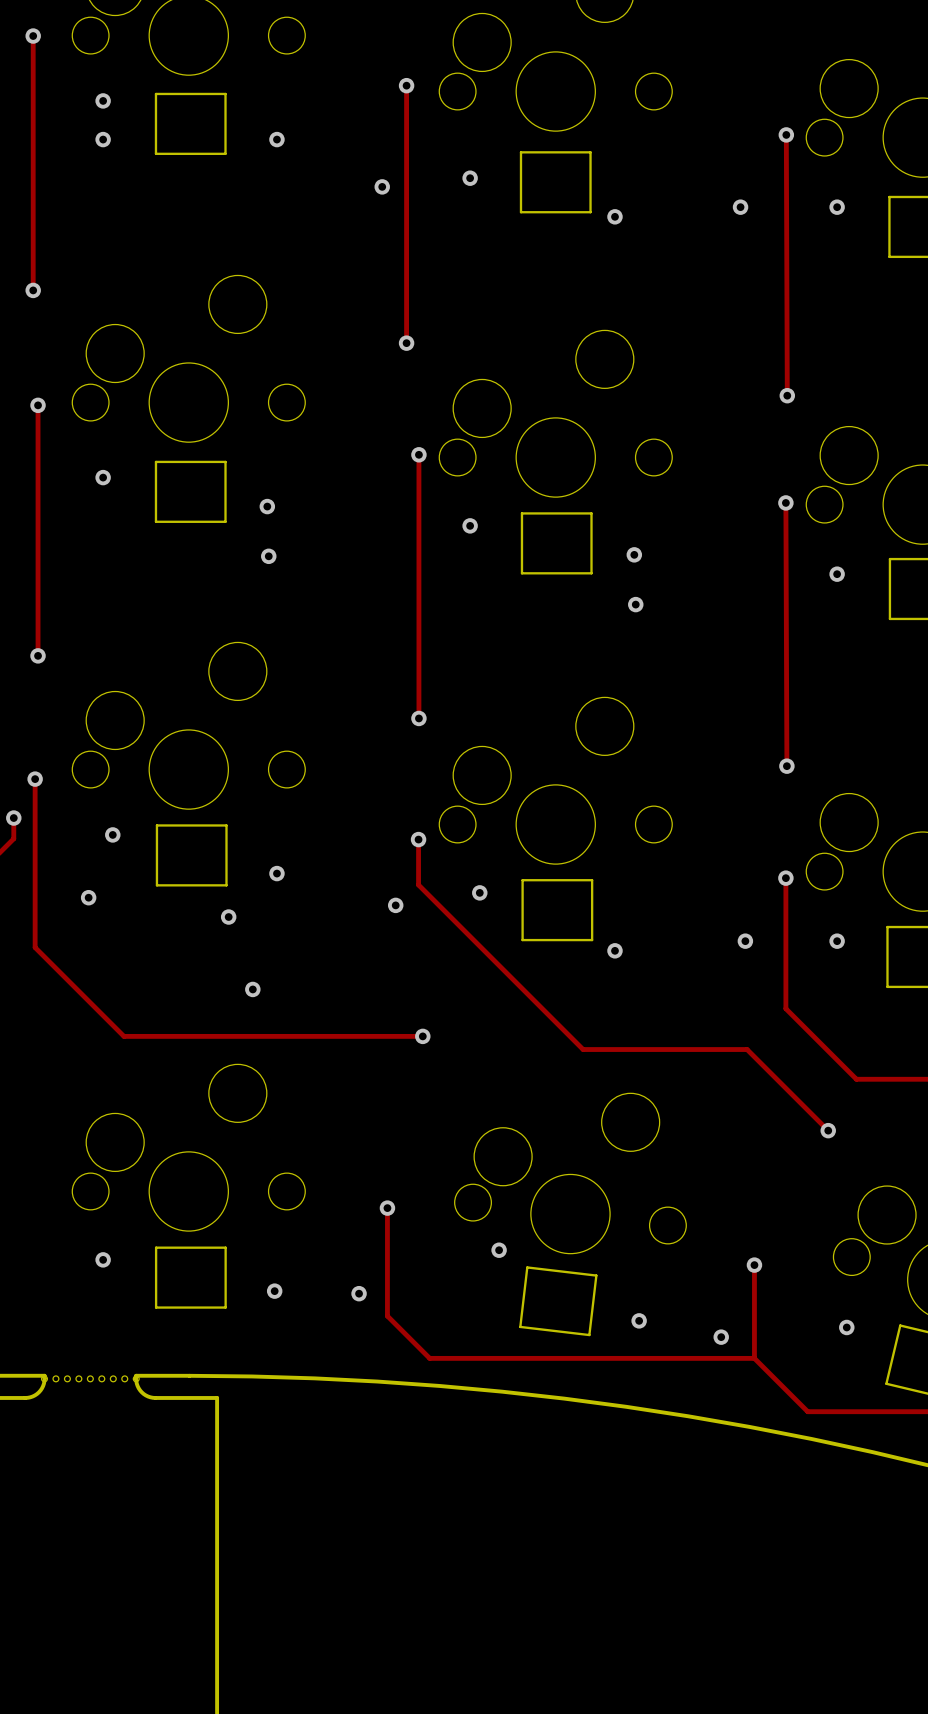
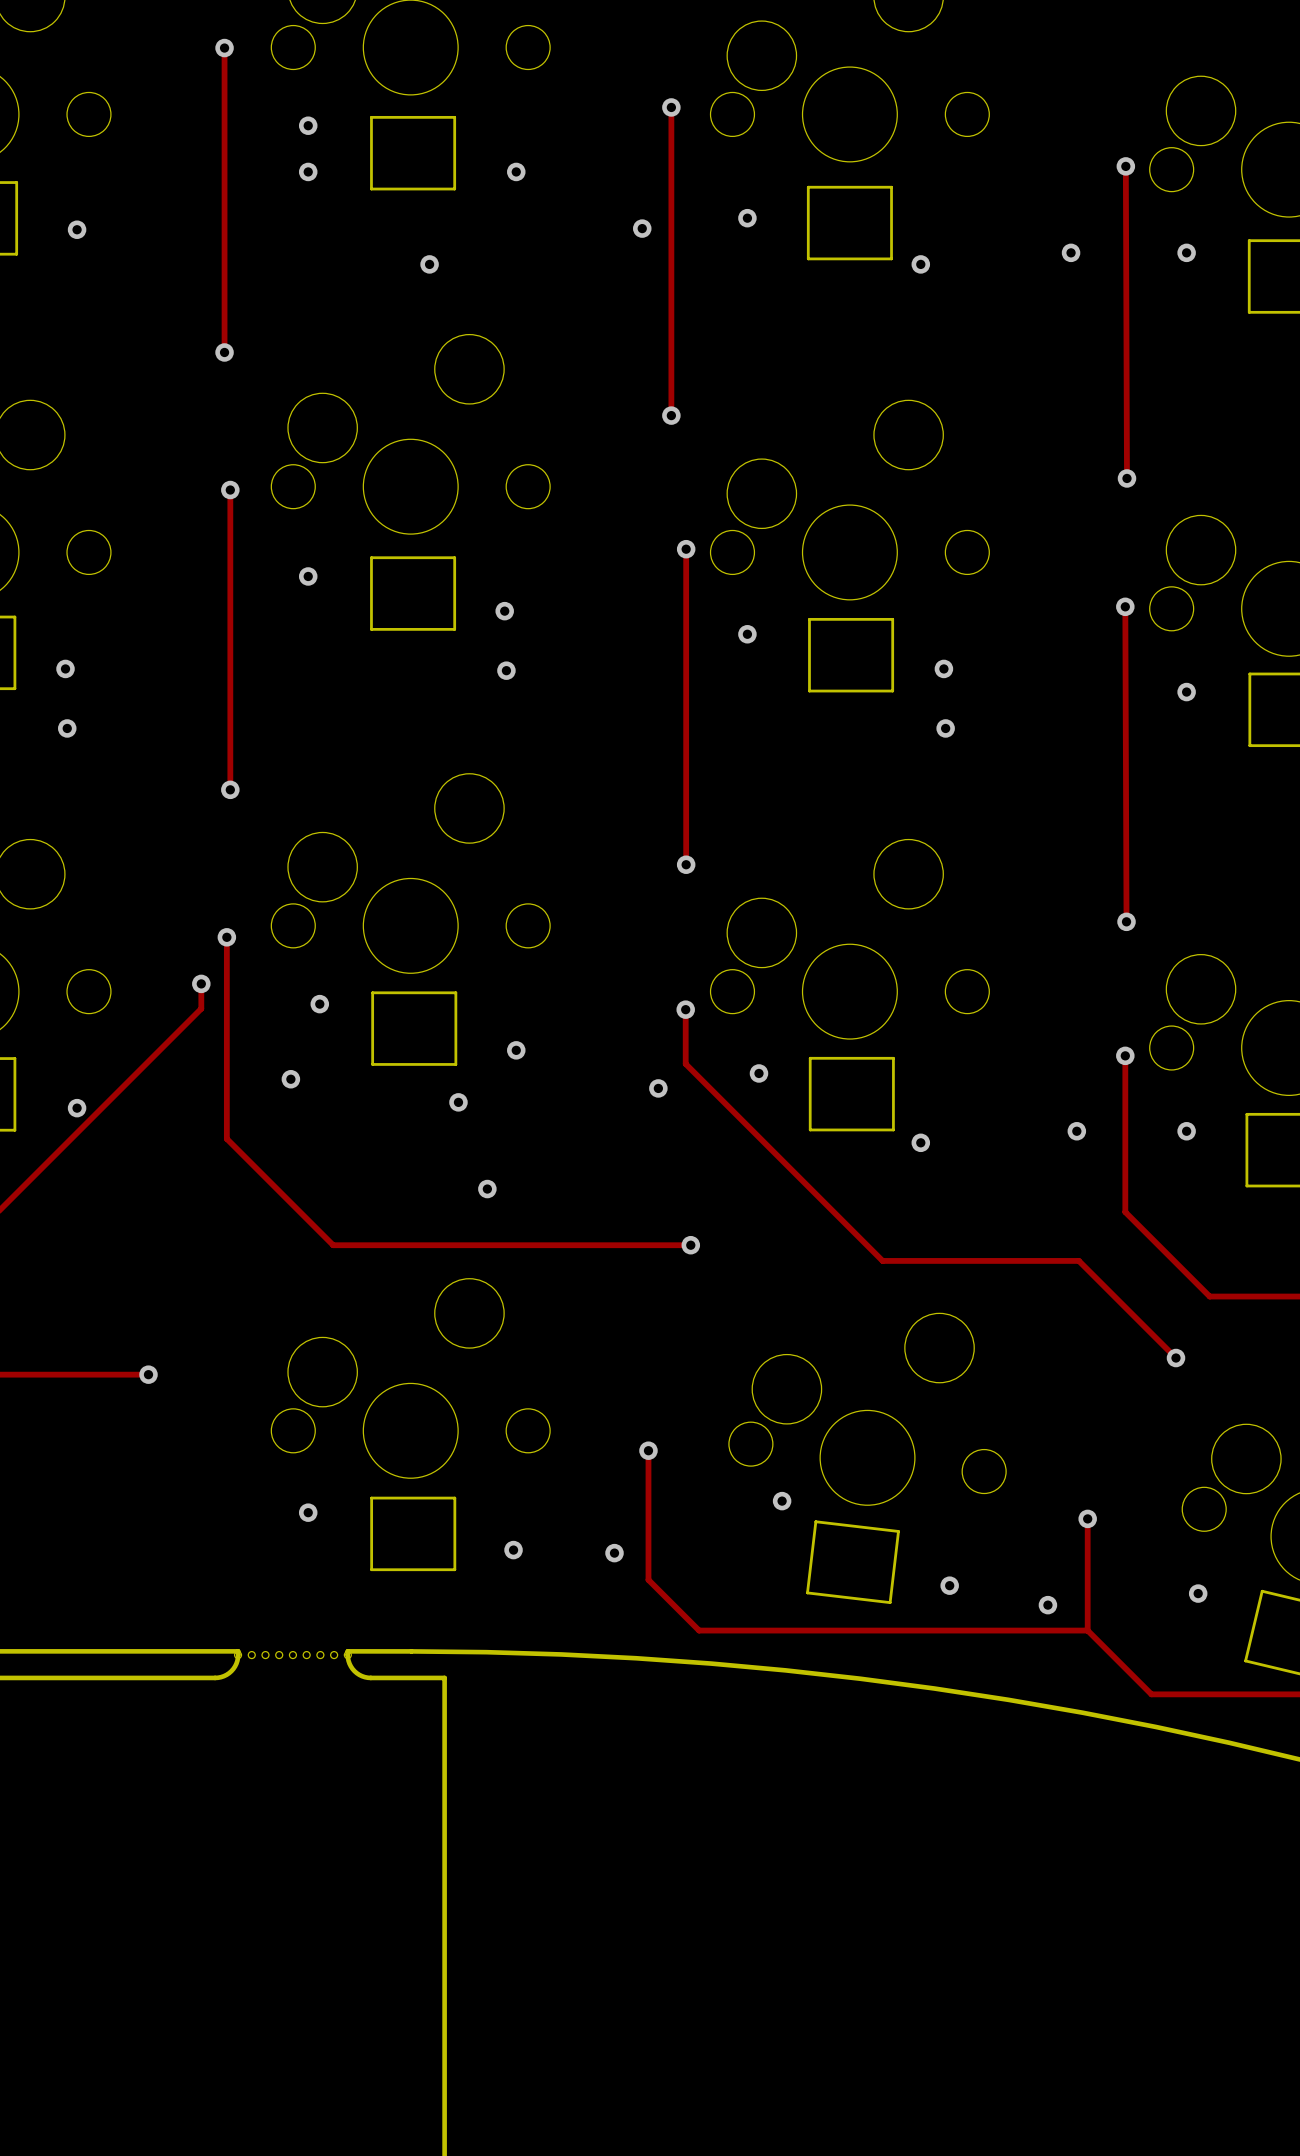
via: none -> (429, 264)

